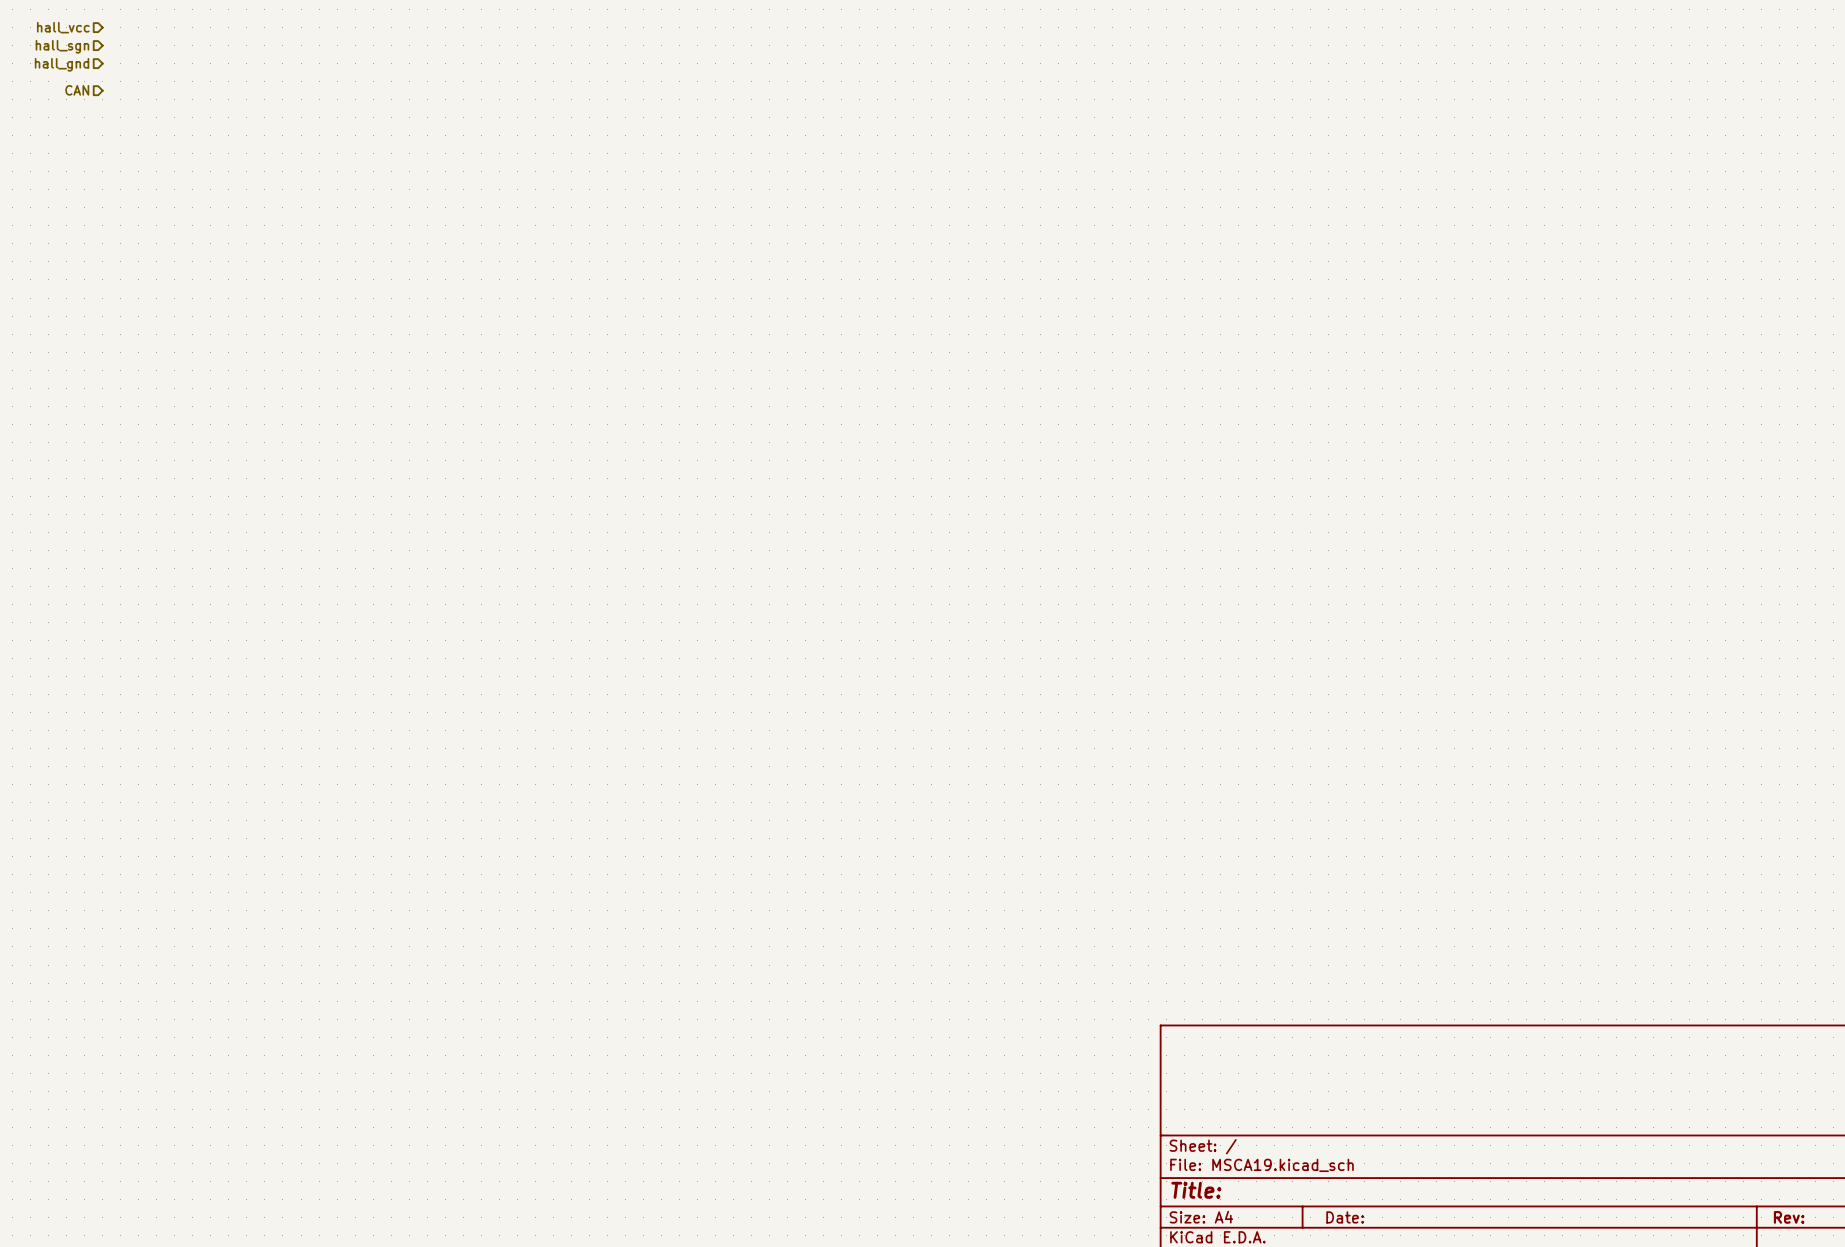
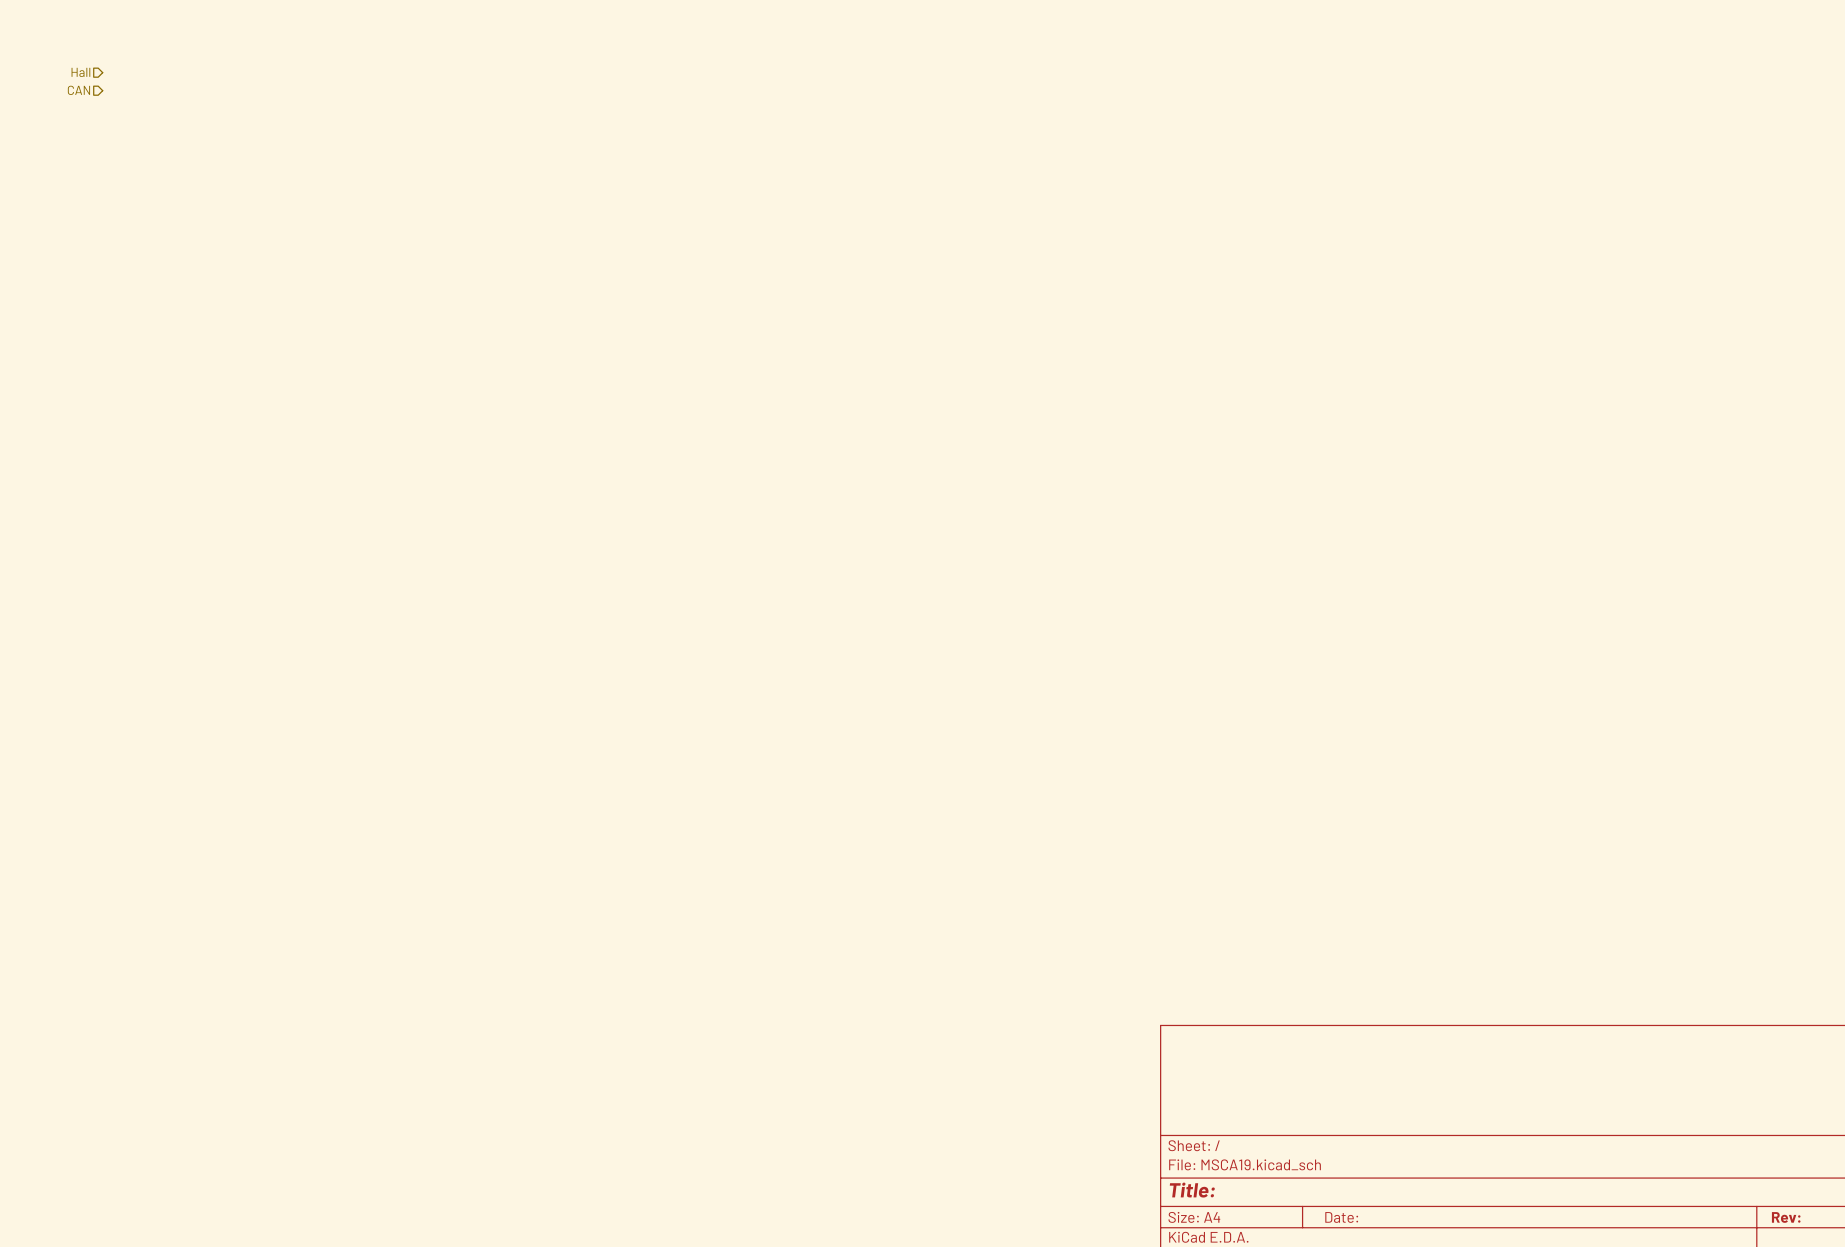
hierarchical label: hall_vcc (63, 27) -> none
hierarchical label: hall_sgn (62, 46) -> none
hierarchical label: hall_gnd (62, 64) -> none
hierarchical label: none -> Hall (80, 72)

